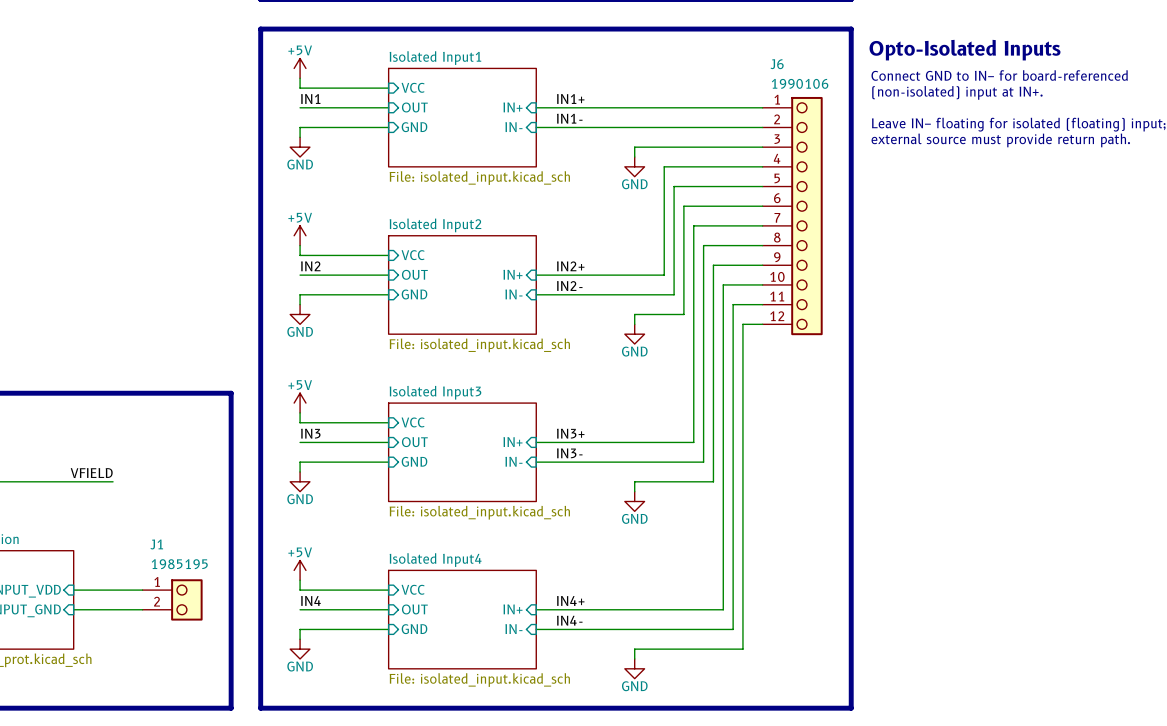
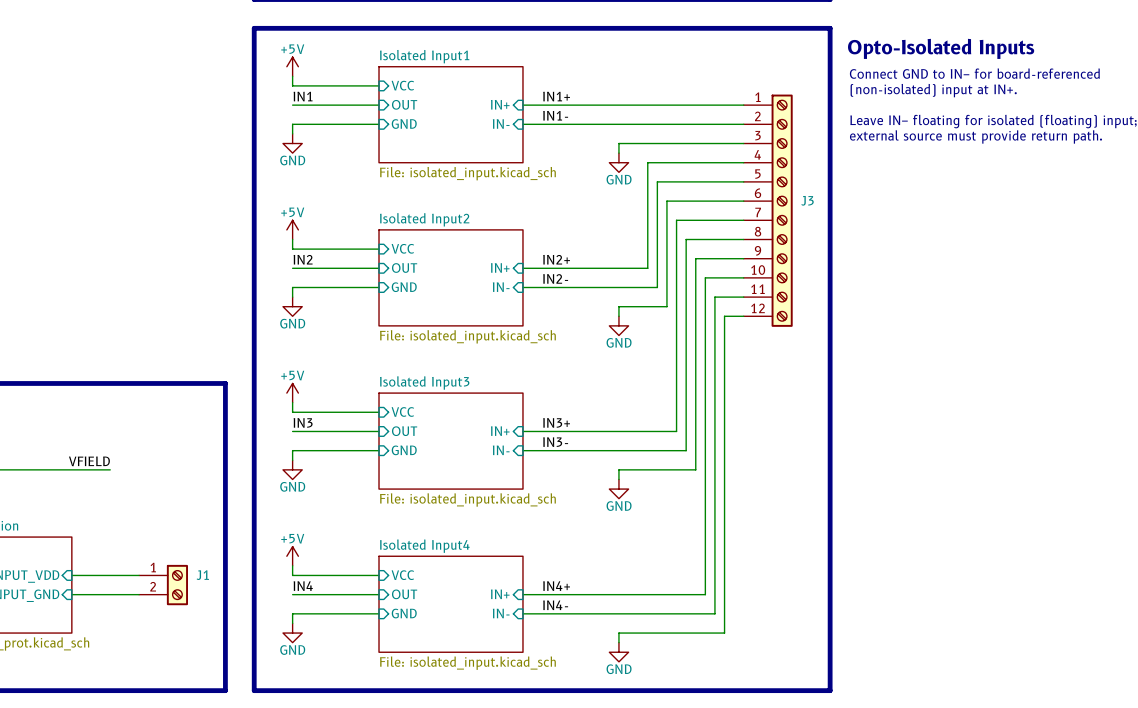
J3: none -> (768, 210)
J6: 1990106 (792, 216) -> none
J1 name position: J1 (156, 544) -> J1 (202, 575)
J1 value: 1985195 (179, 564) -> none
J1 symbol: [142, 579, 203, 621] -> [139, 564, 188, 606]

